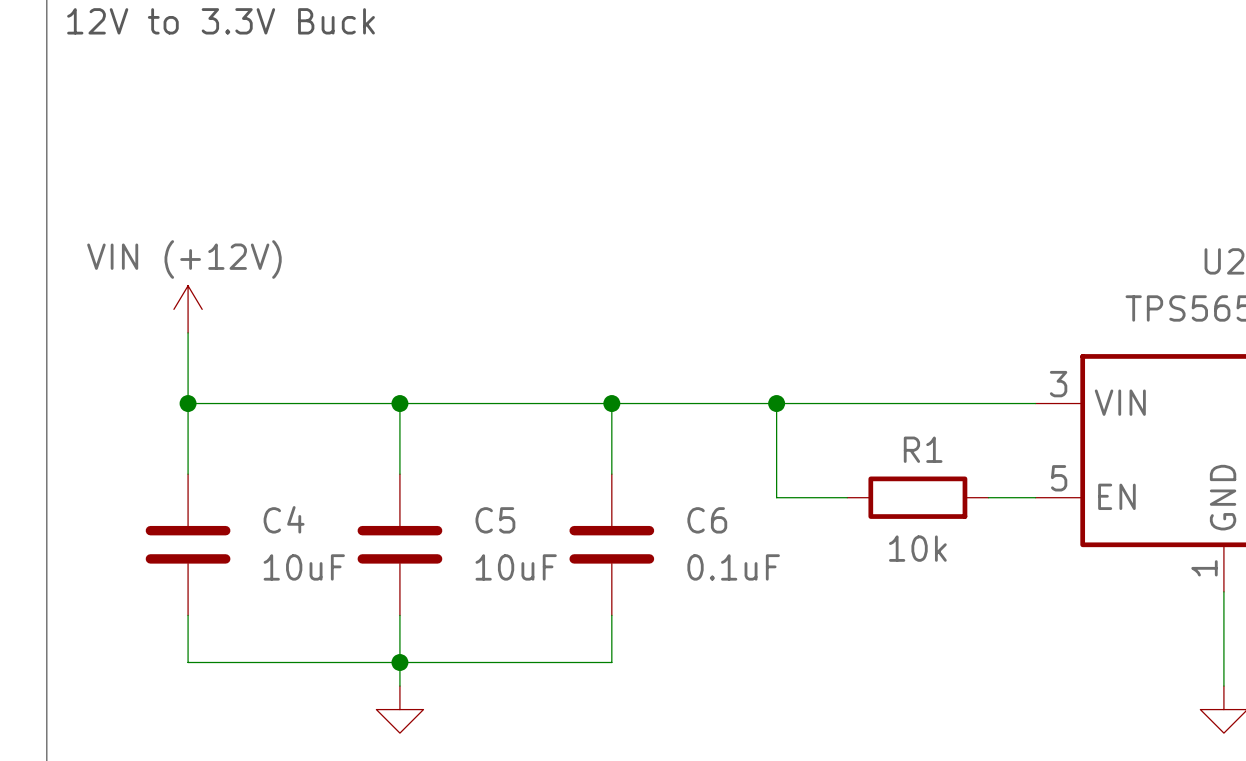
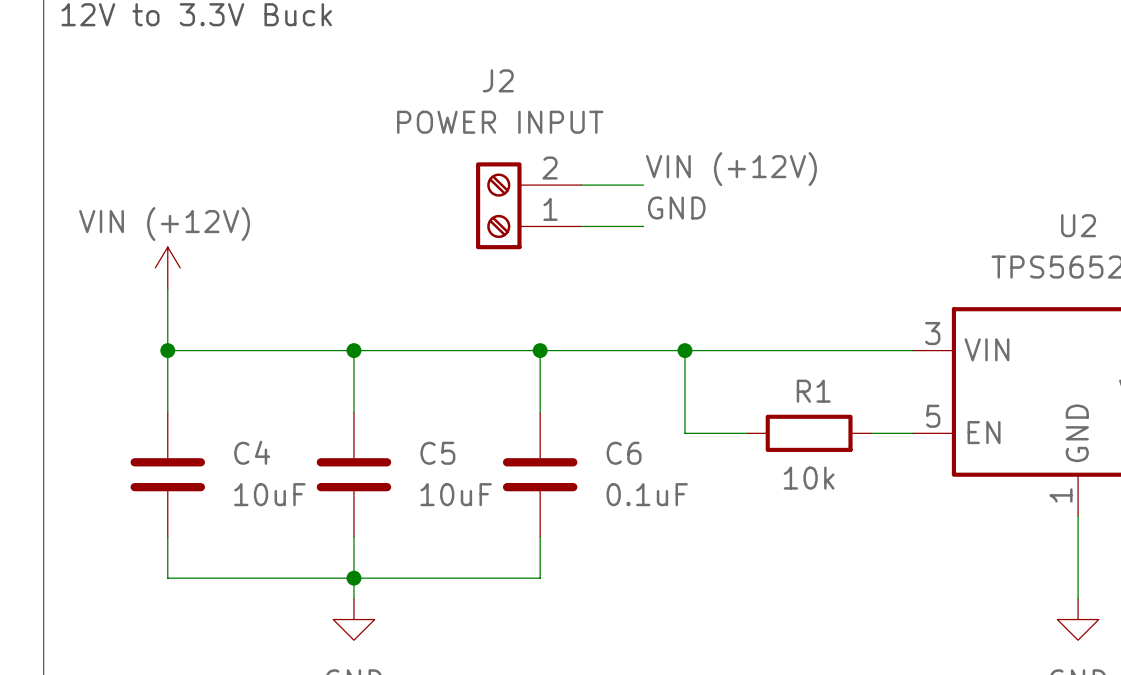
label: none -> VIN (+12V) (731, 169)
wire: none -> (581, 185) (643, 185)
J2: none -> POWER INPUT (528, 205)
label: none -> GND (676, 208)
wire: none -> (581, 226) (643, 226)

